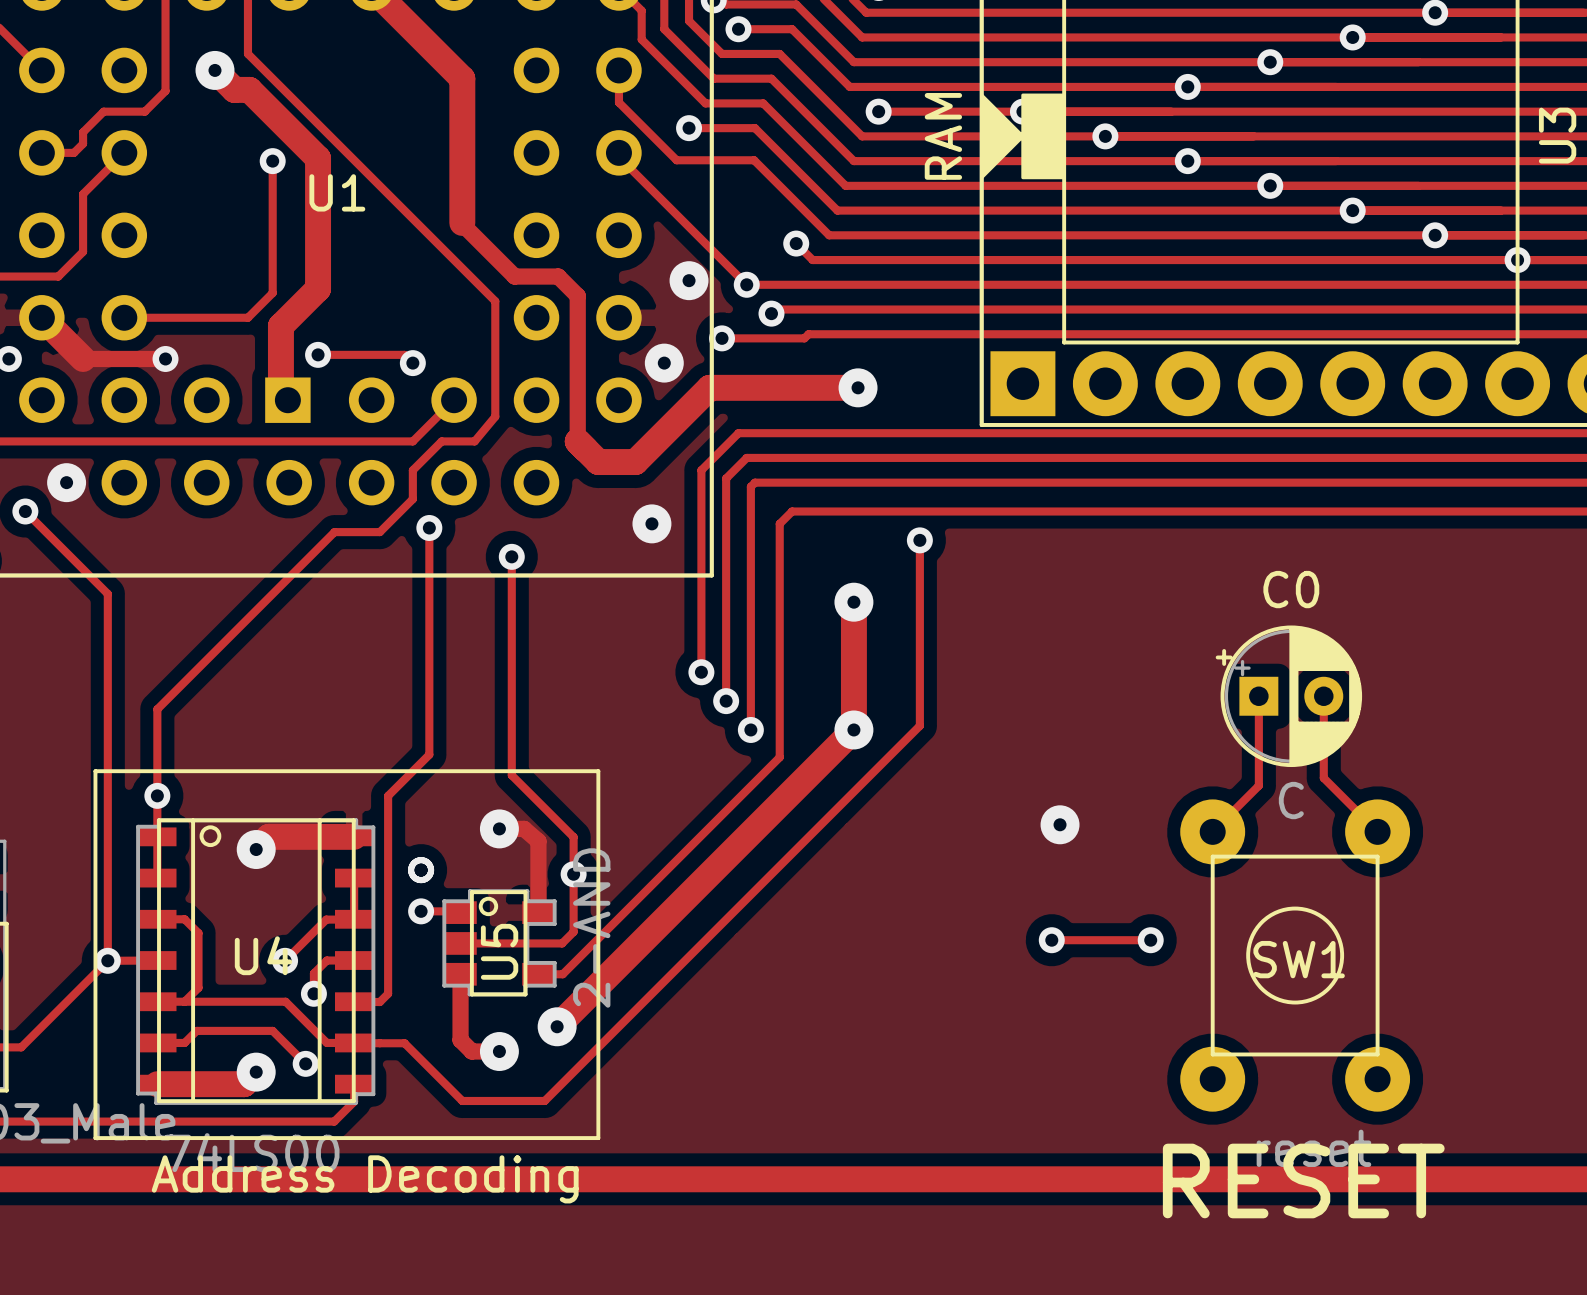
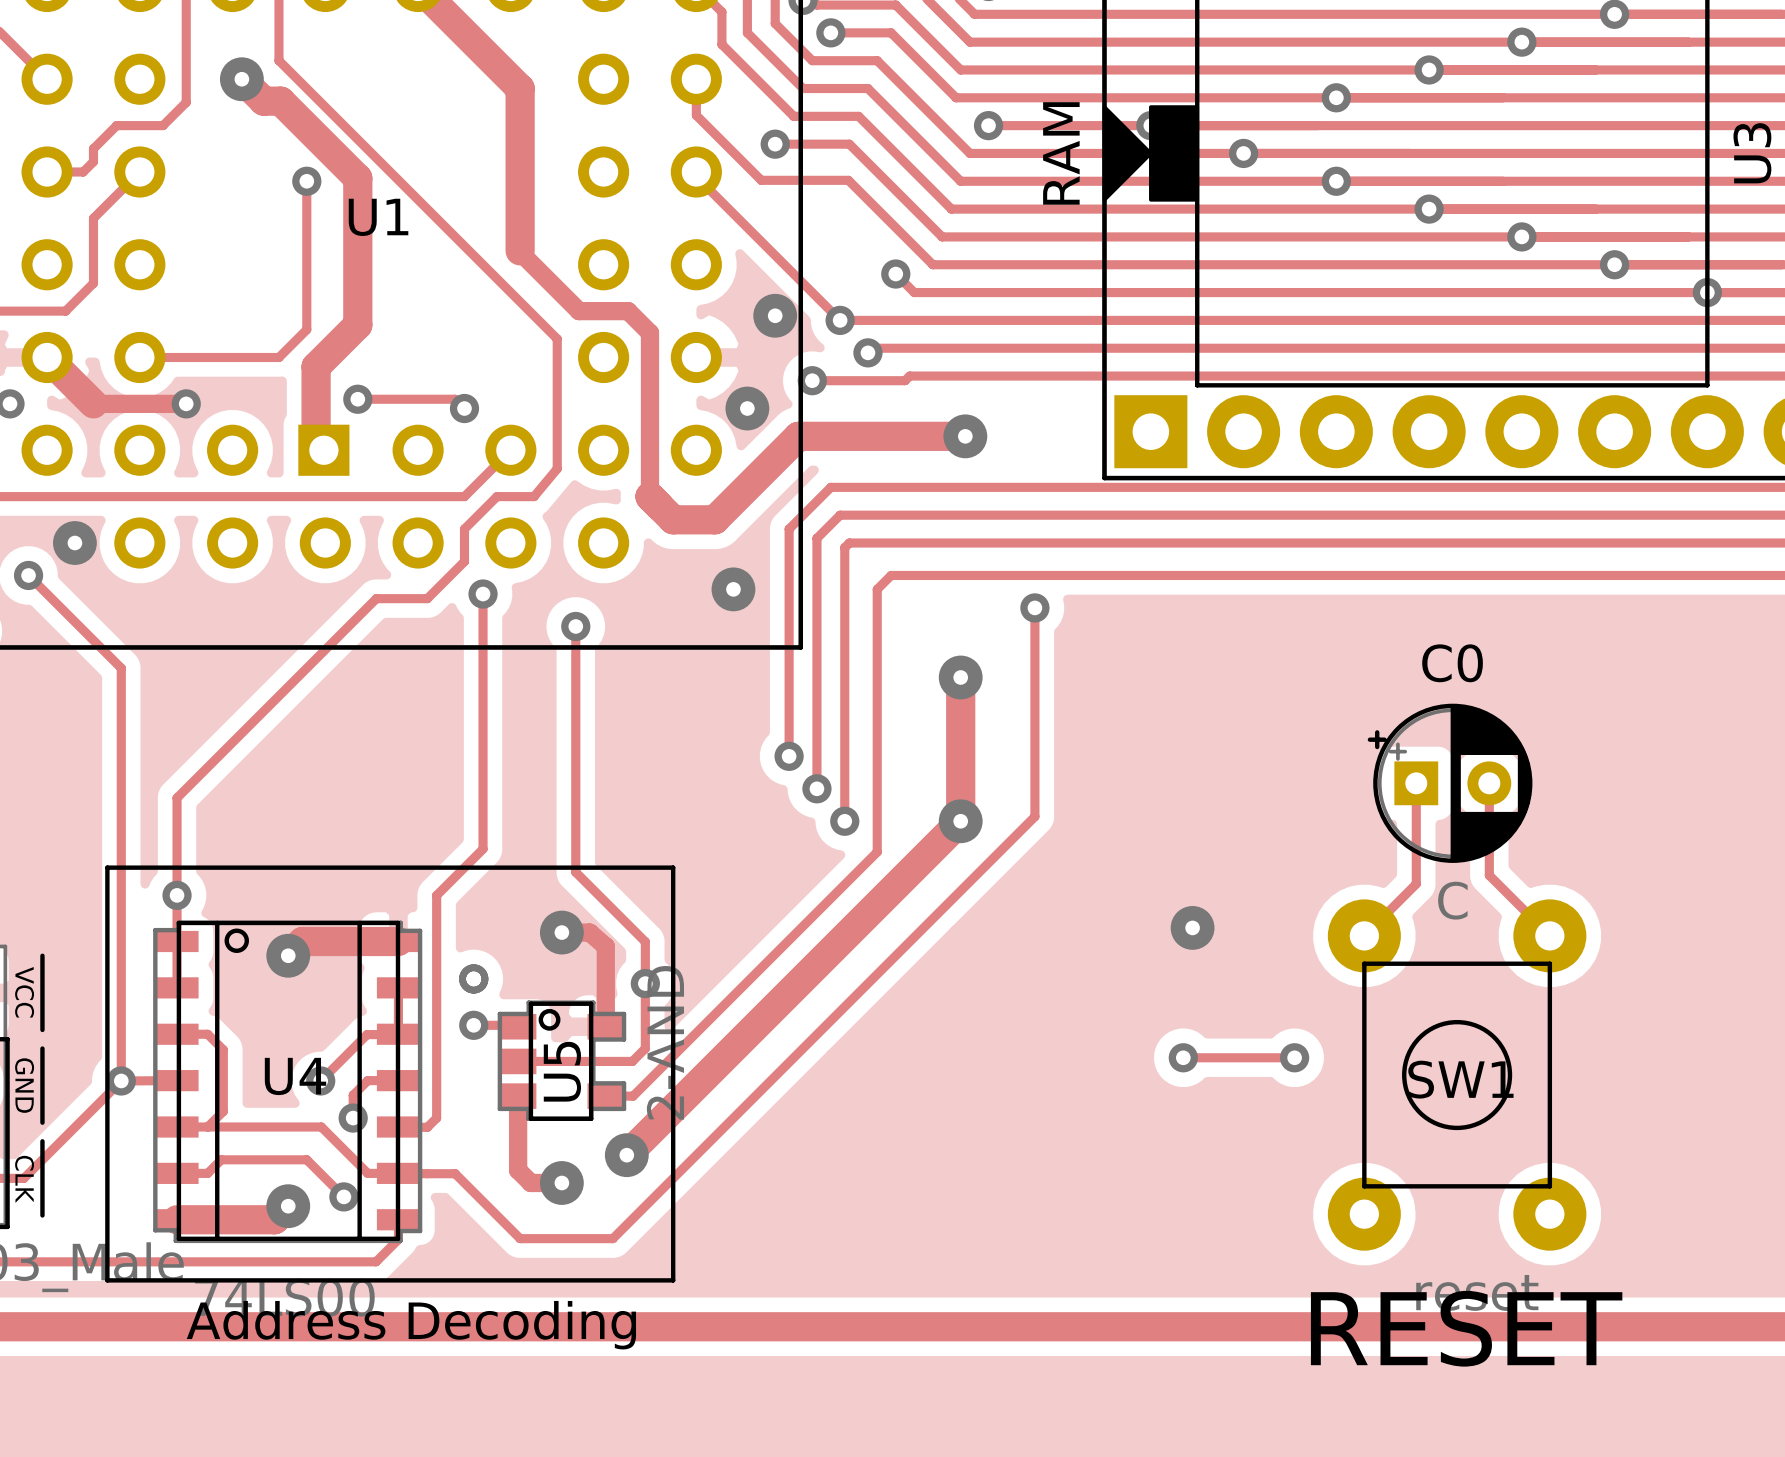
line: none -> (42, 955) (42, 1029)
text: none -> VCC (24, 992)
line: none -> (42, 1048) (42, 1122)
text: none -> GND (24, 1085)
line: none -> (42, 1141) (42, 1215)
text: none -> CLK (24, 1179)

